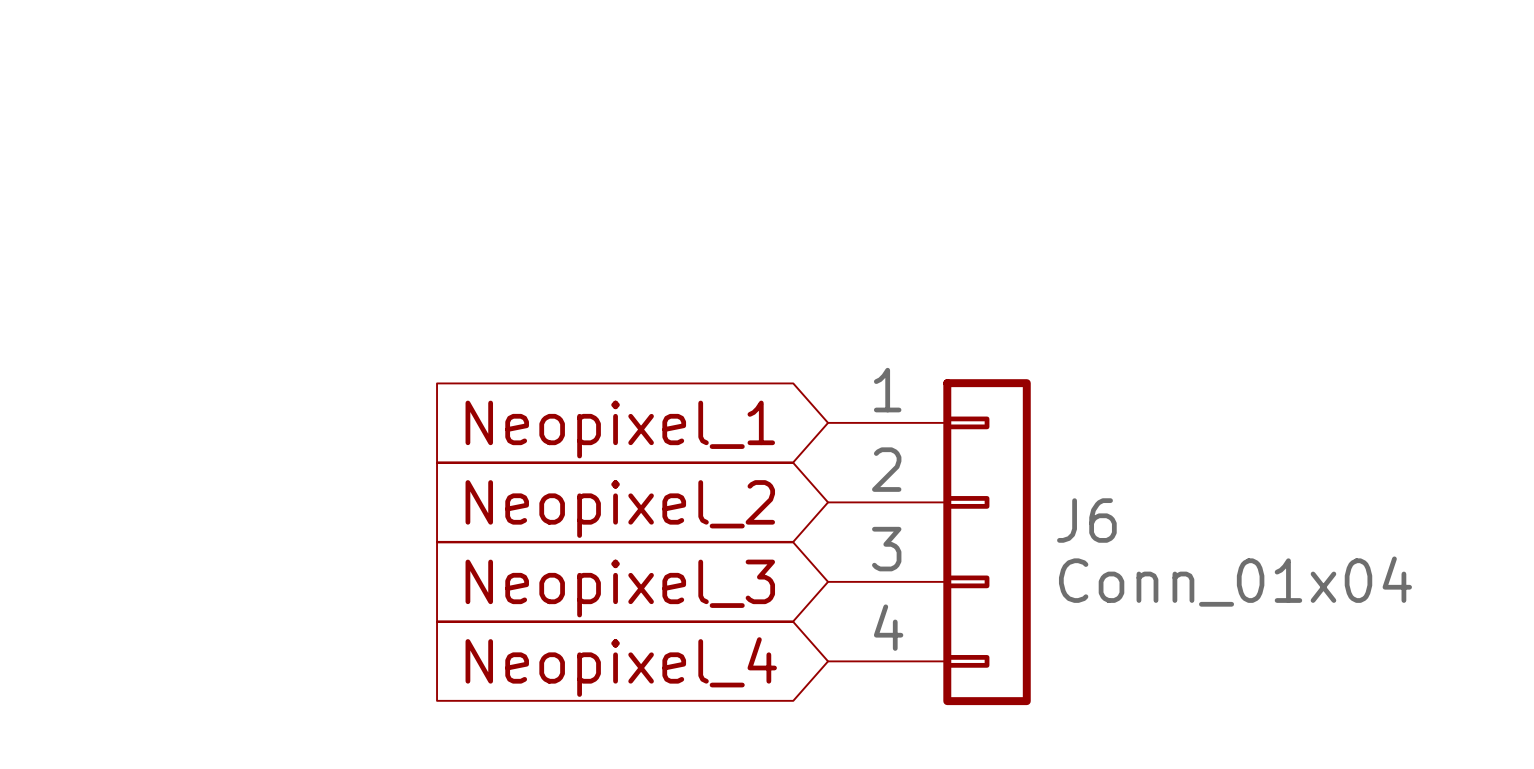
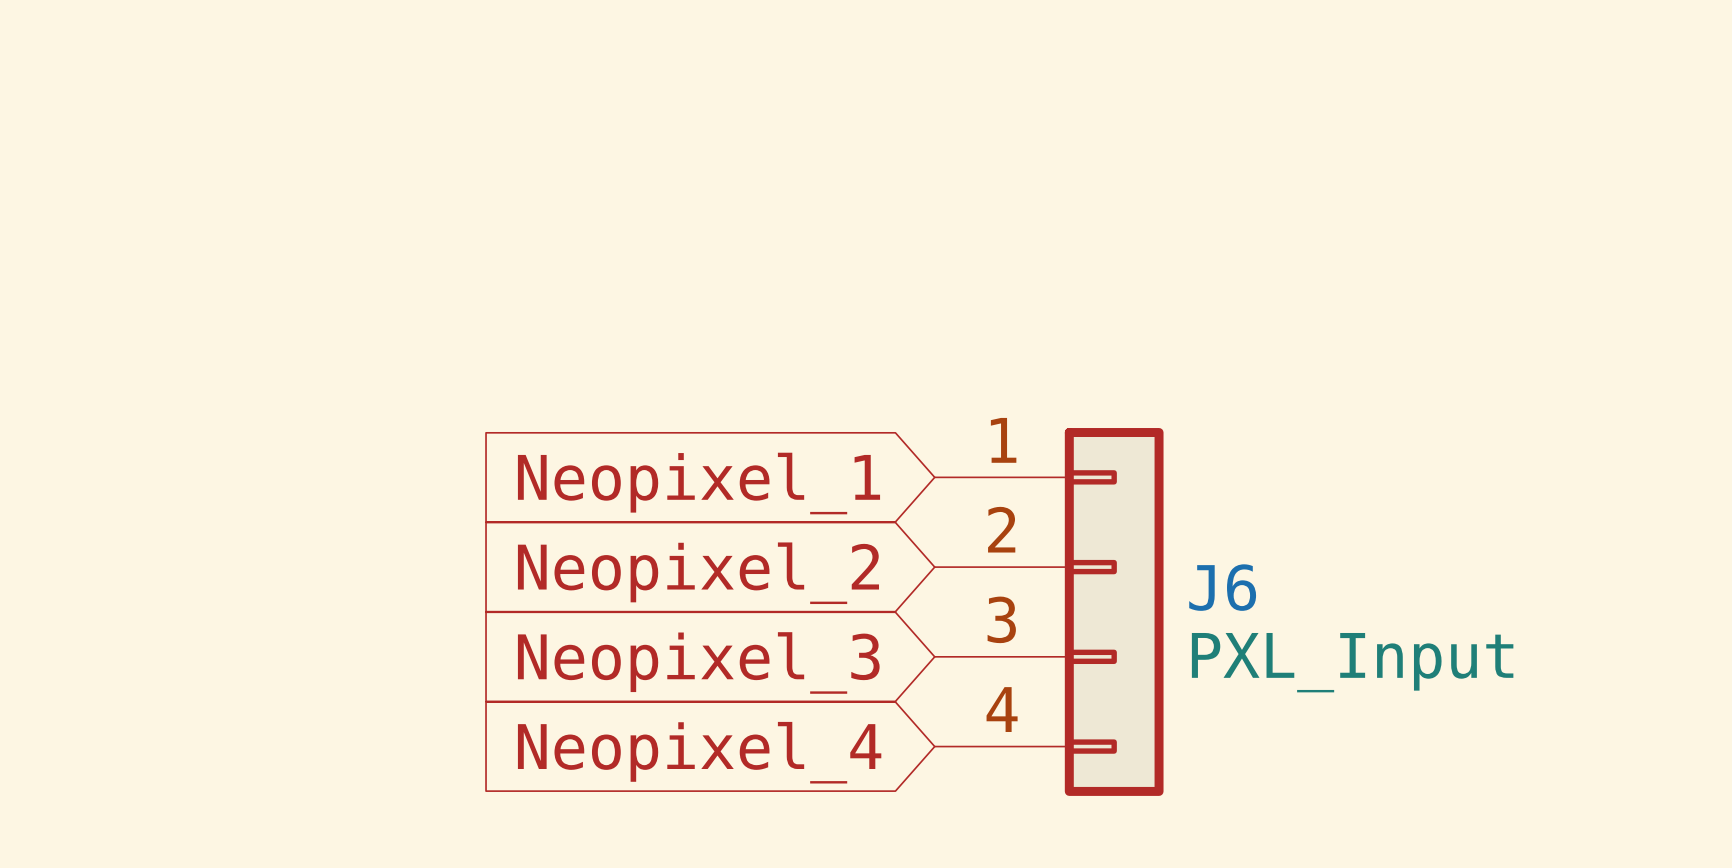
J6 value: Conn_01x04 (1235, 581) -> PXL_Input (1352, 662)

